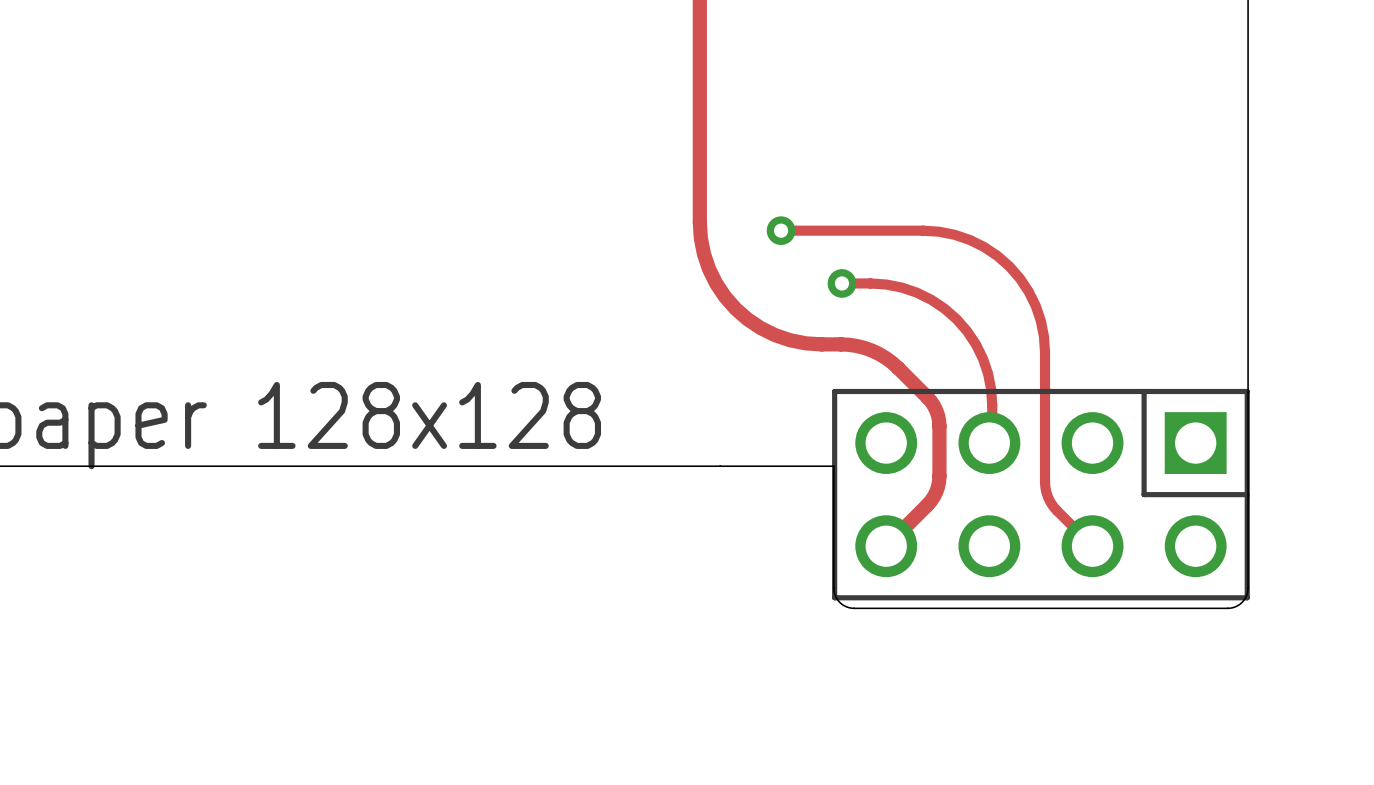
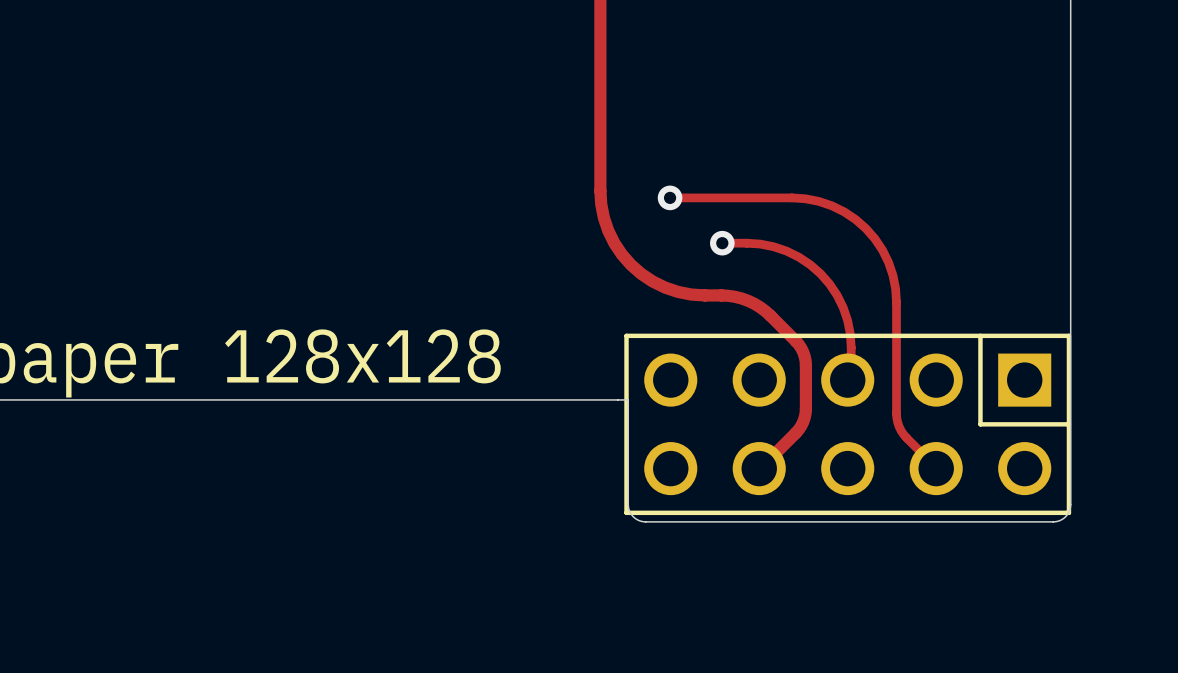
board edge: (732, 466) (833, 466) (834, 590) (839, 602) (846, 606) (854, 608) -> (628, 399) (628, 504) (631, 515) (643, 521) (732, 521)
part: none -> (847, 424)
part: (1040, 494) -> none

